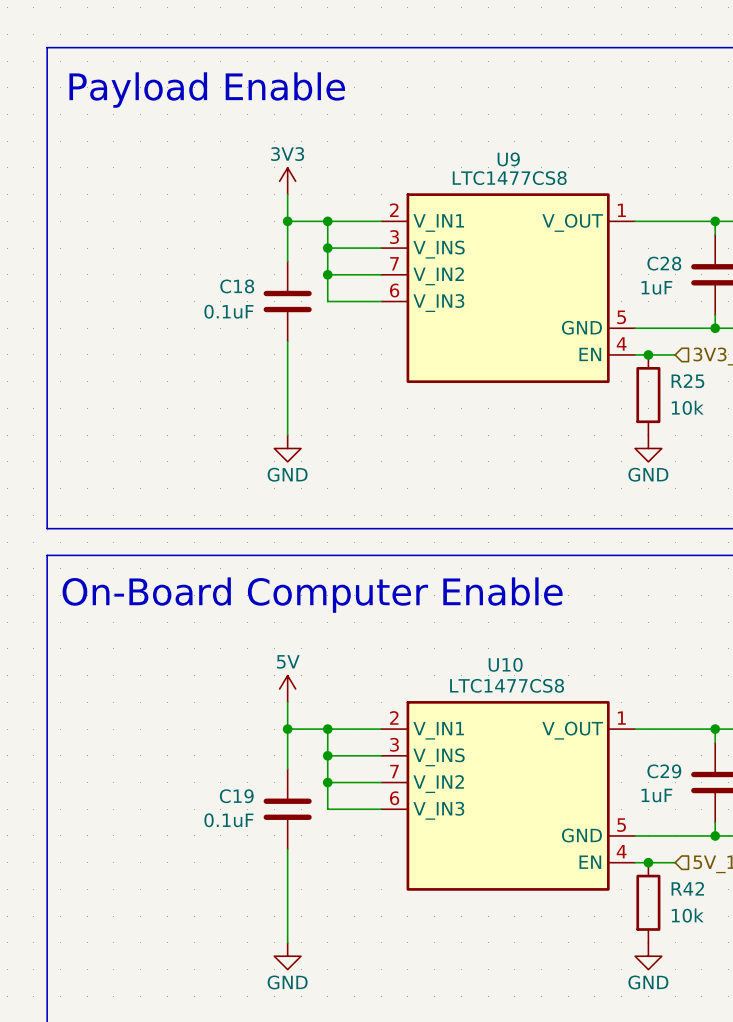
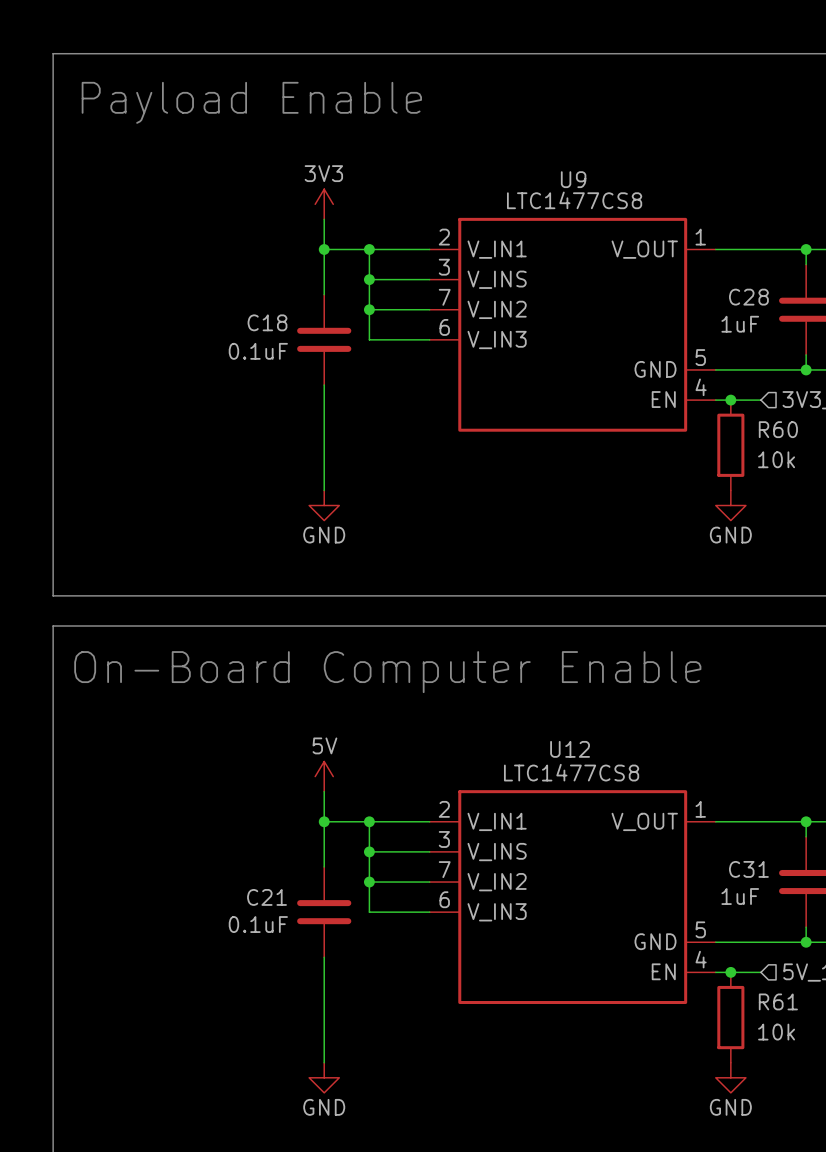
R25 name: R25 (687, 381) -> R60 (778, 429)
U10 name: U10 (505, 664) -> U12 (570, 749)
C29 name: C29 (664, 771) -> C31 (748, 869)
C19 name: C19 (236, 796) -> C21 (267, 897)
R42 name: R42 (687, 888) -> R61 (778, 1001)

